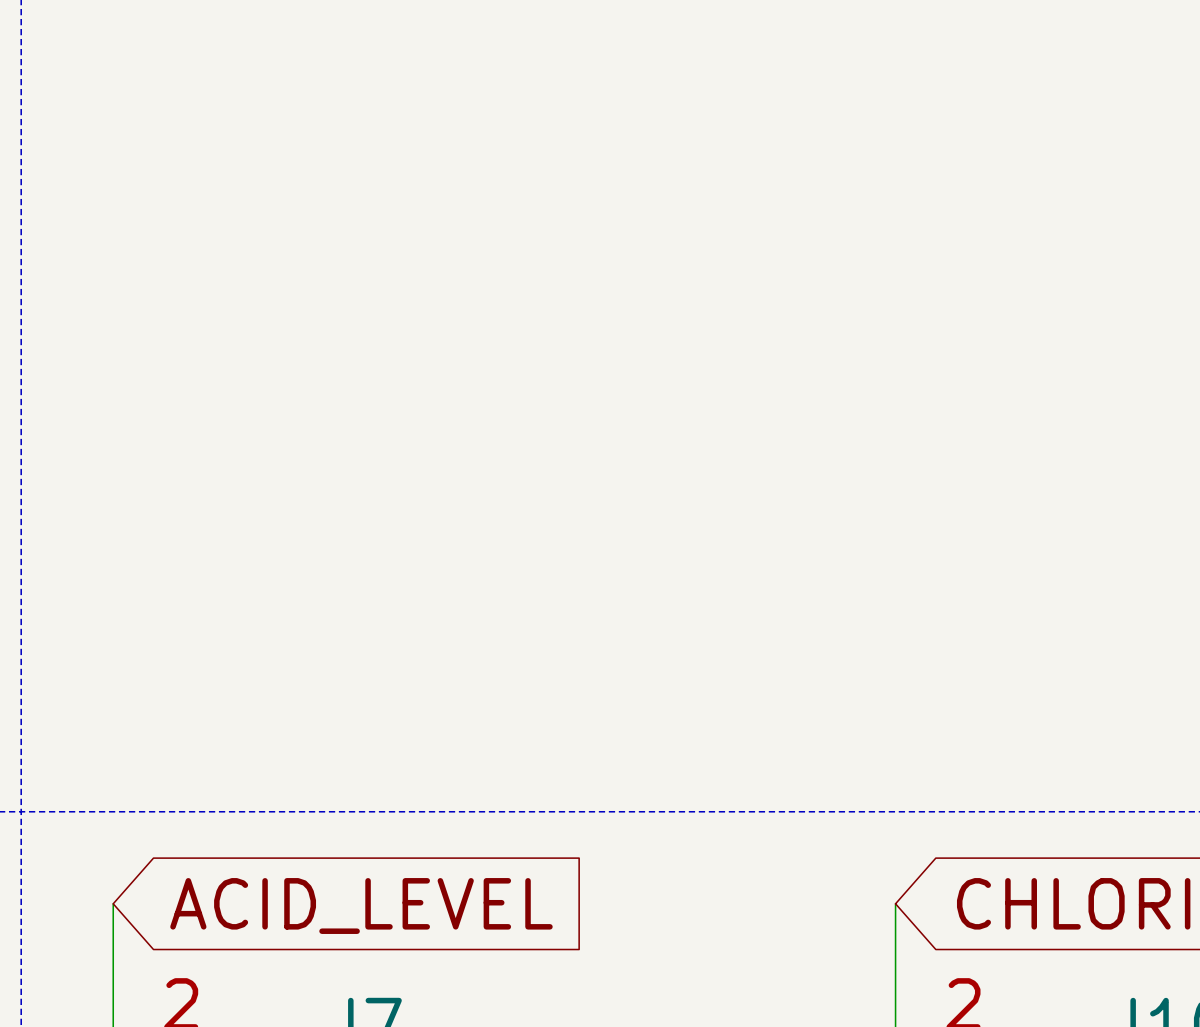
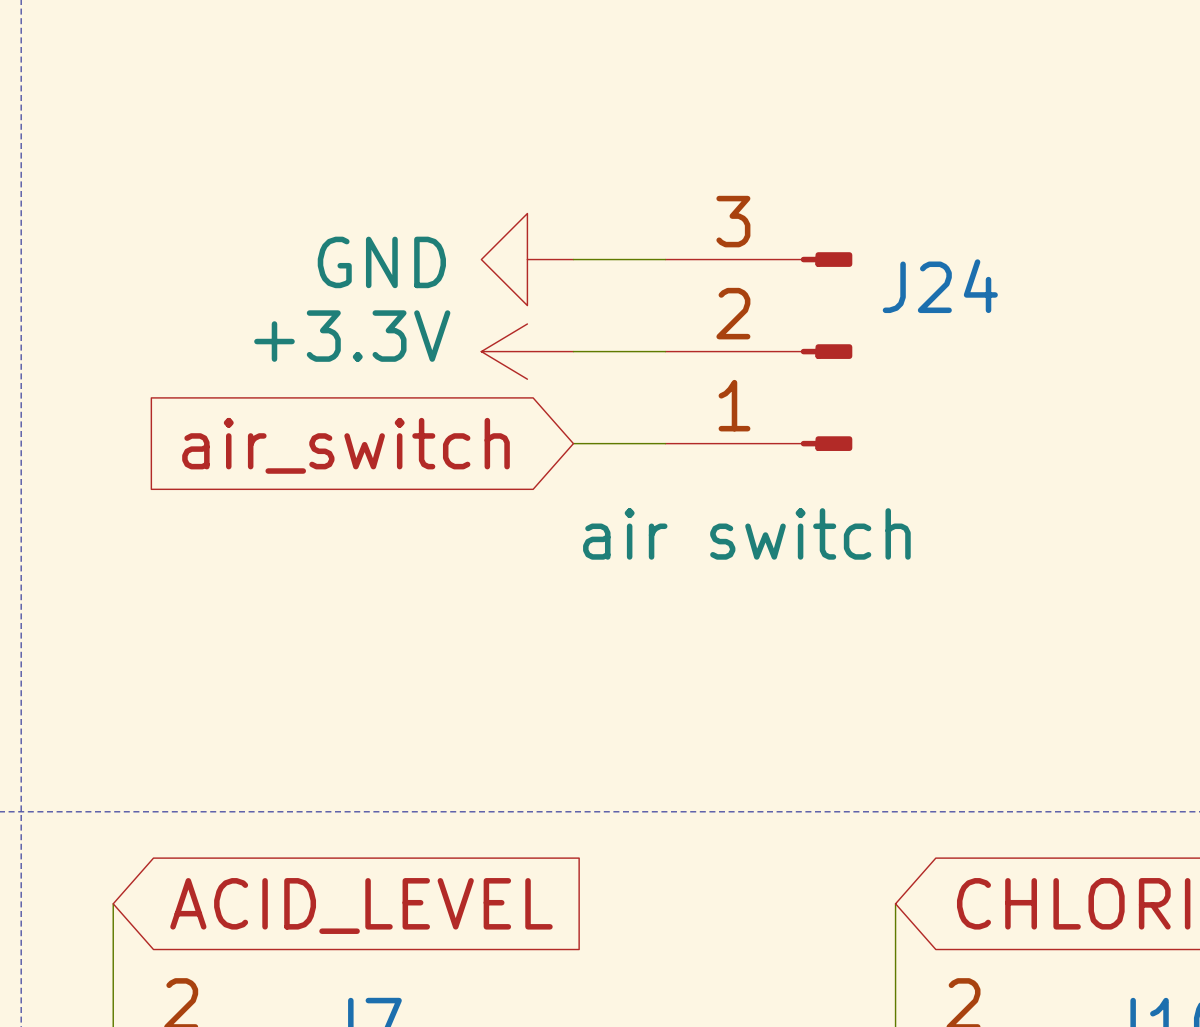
power symbol: none -> GND (527, 259)
wire: none -> (573, 259) (665, 259)
power symbol: none -> +3.3V (527, 351)
wire: none -> (573, 351) (665, 351)
J24: none -> air switch (758, 351)
wire: none -> (573, 443) (665, 443)
global label: none -> air_switch (346, 445)

